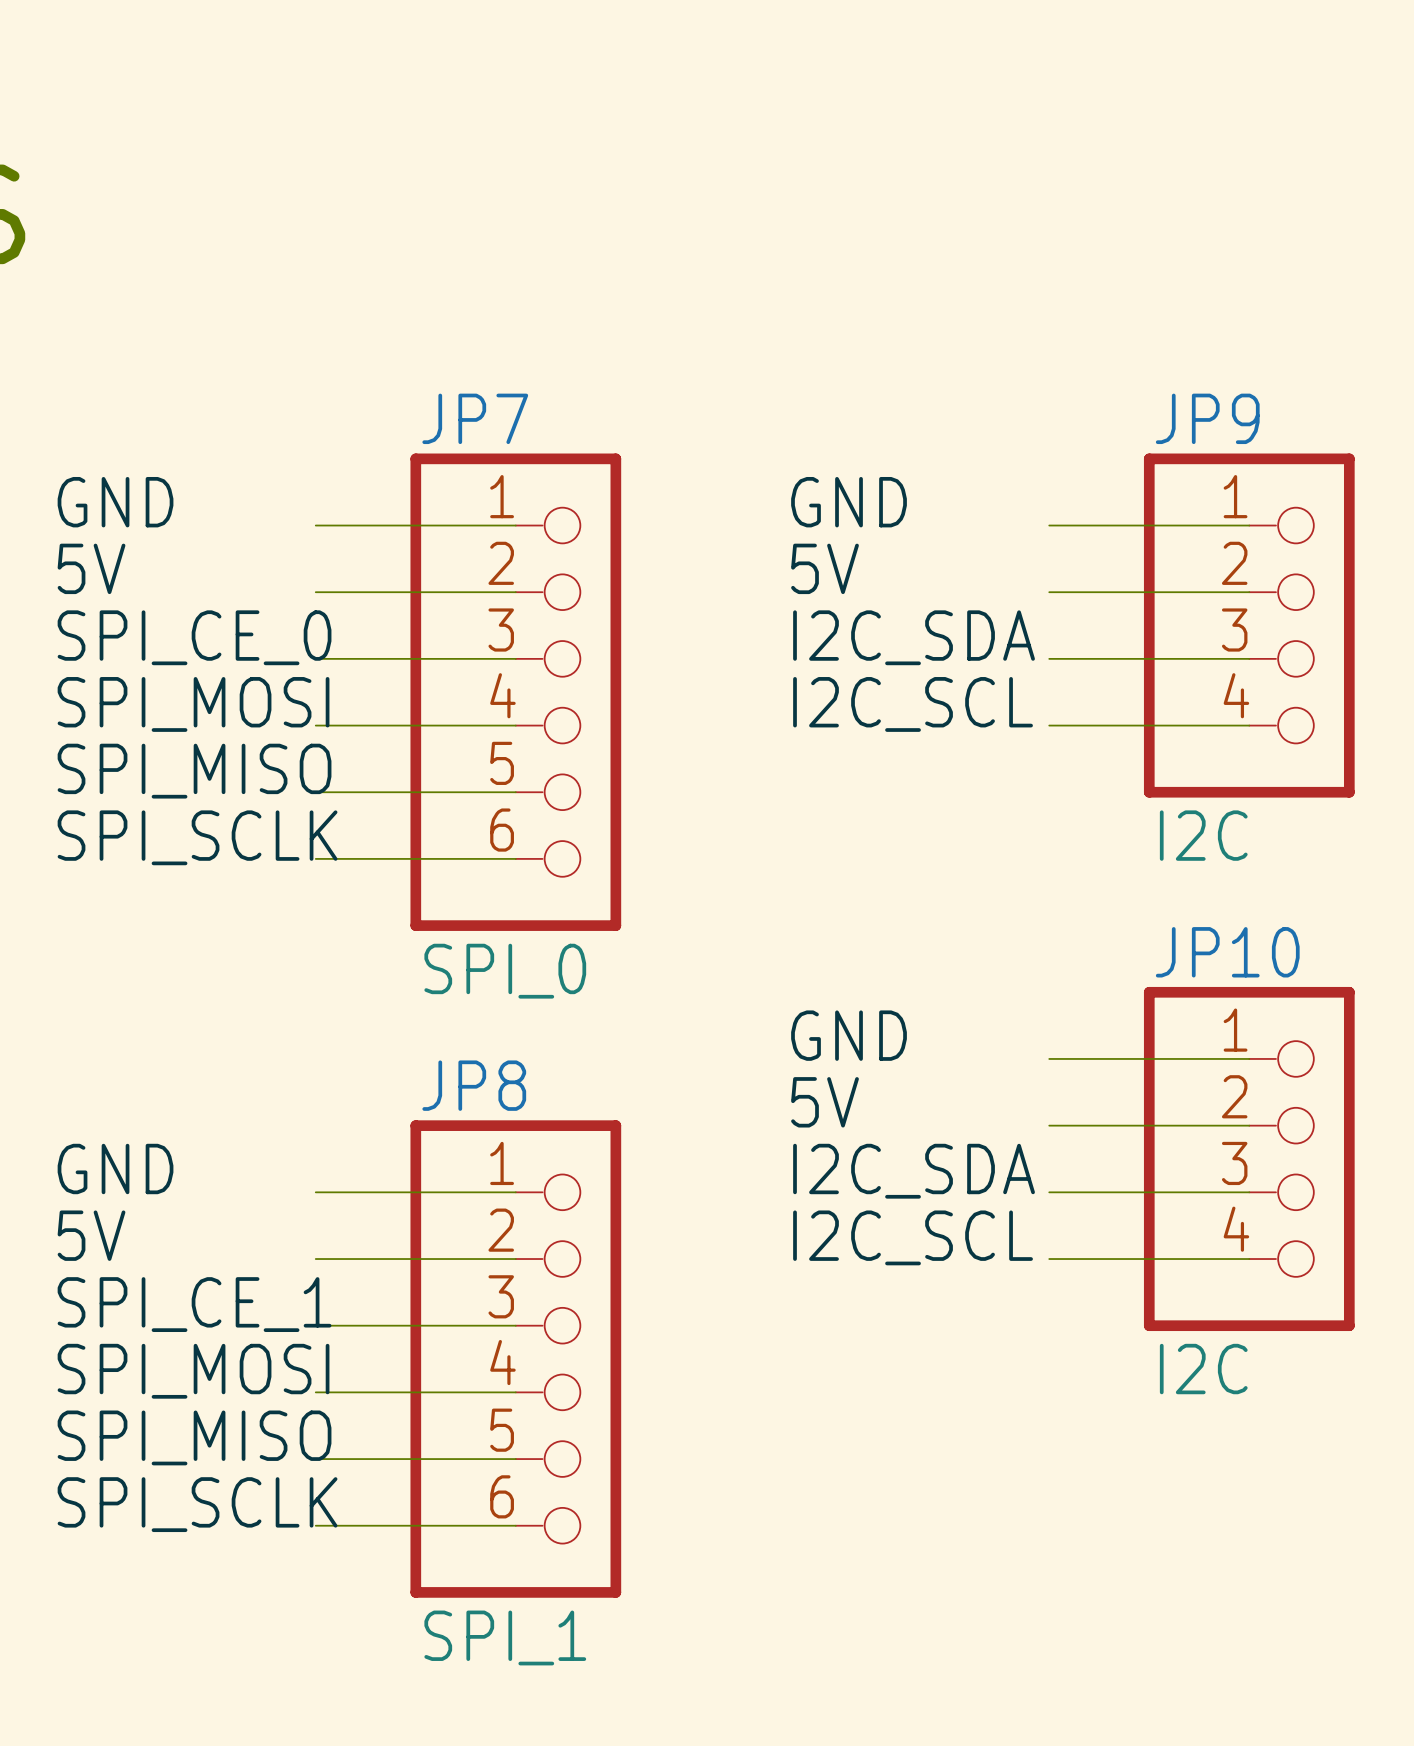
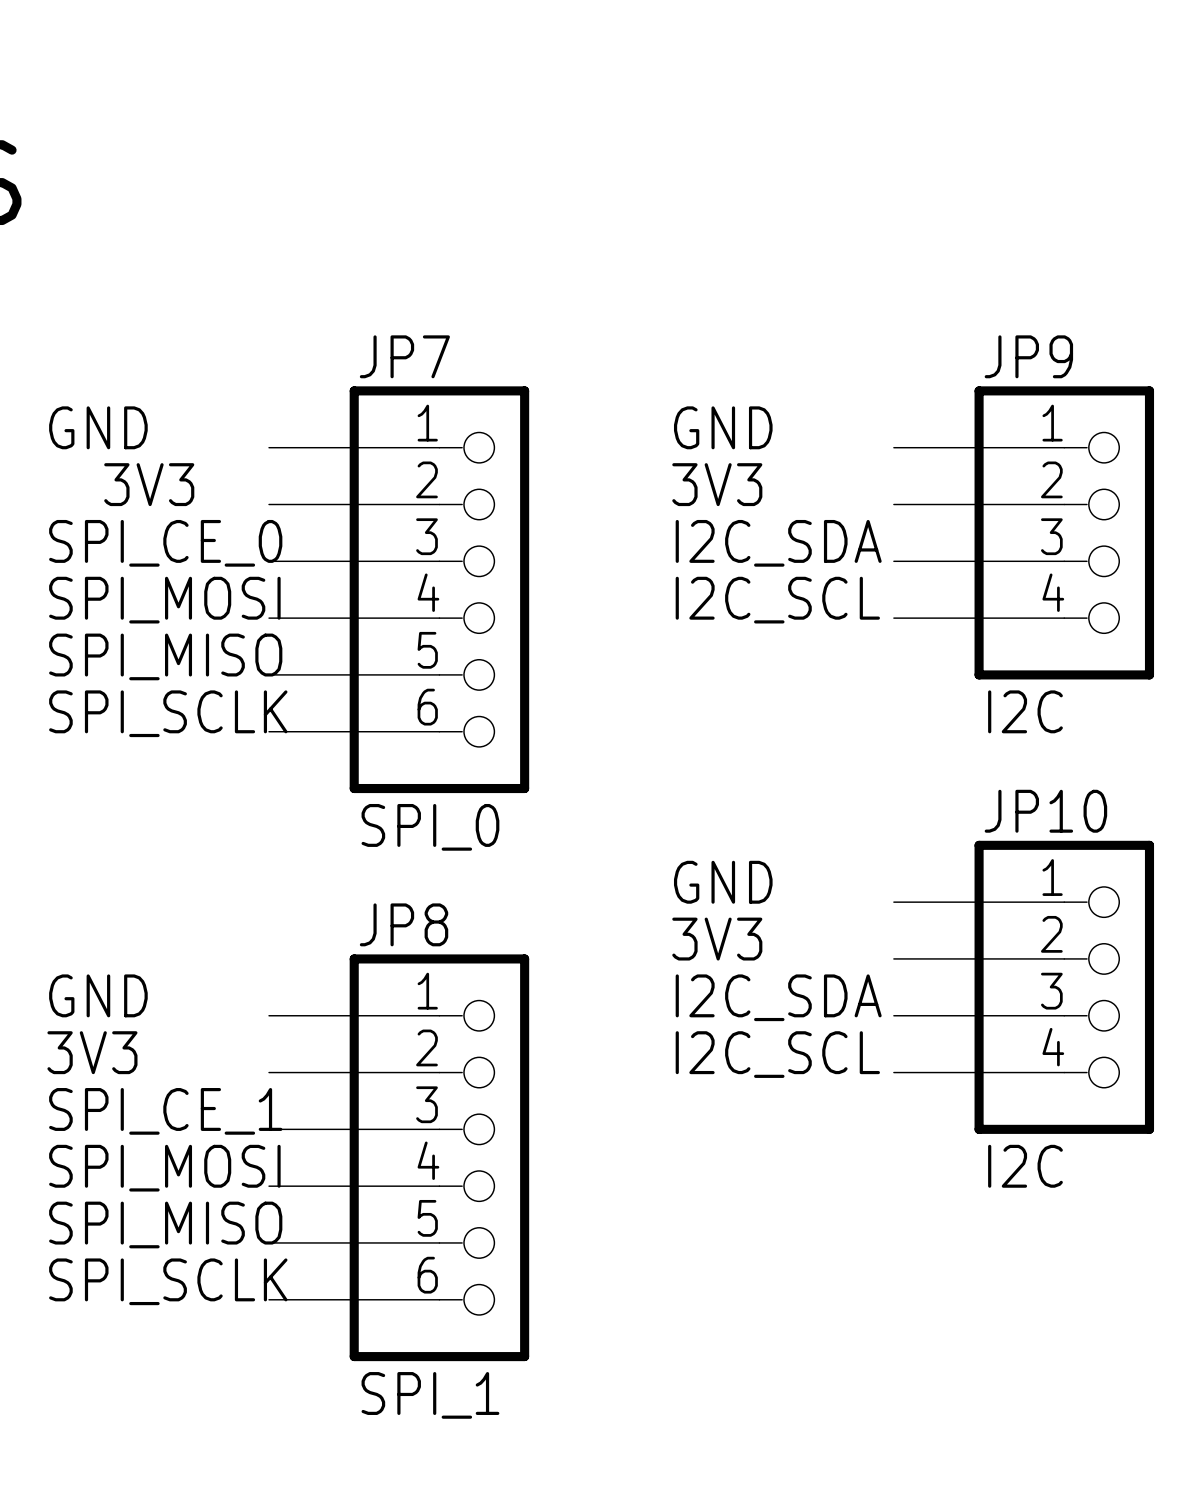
label: 5V (91, 568) -> none
label: none -> 3V3 (149, 484)
label: 5V (825, 568) -> 3V3 (717, 484)
label: 5V (825, 1102) -> 3V3 (717, 939)
label: 5V (91, 1235) -> 3V3 (92, 1052)

